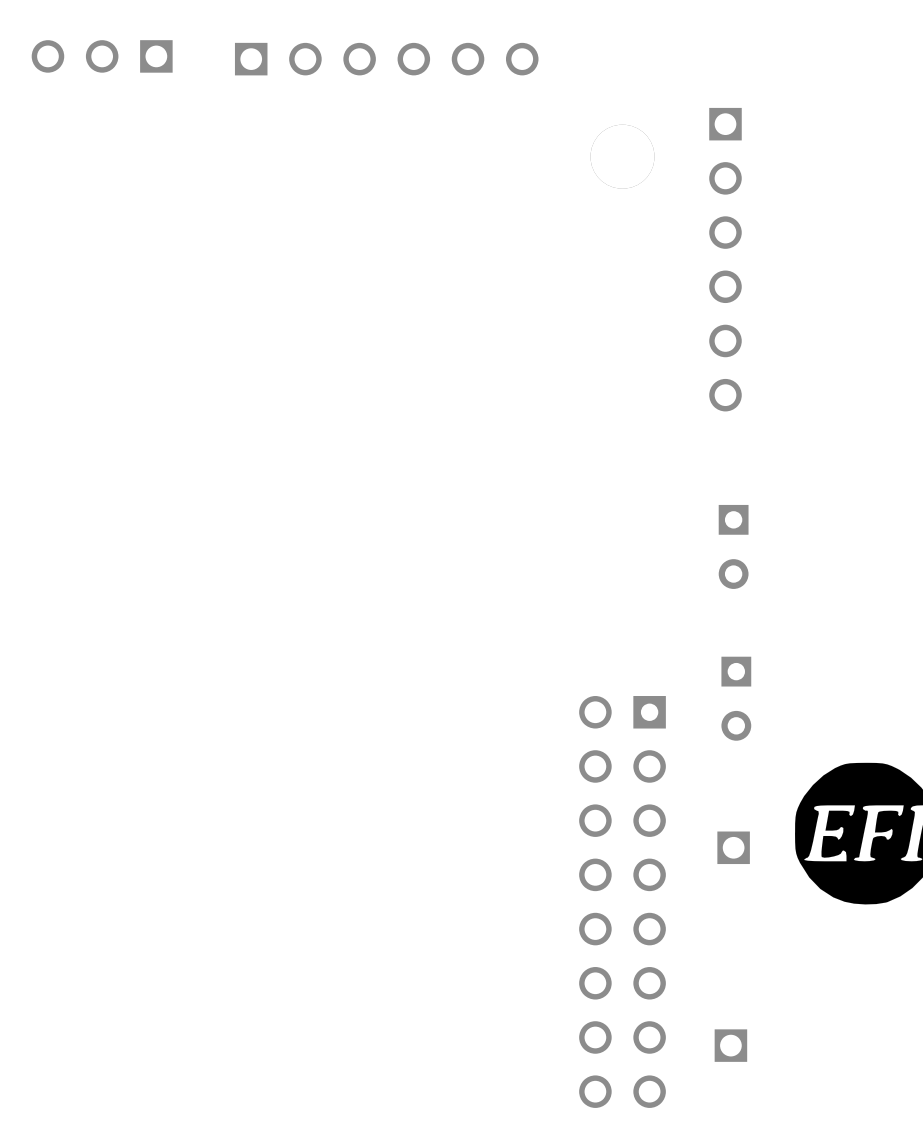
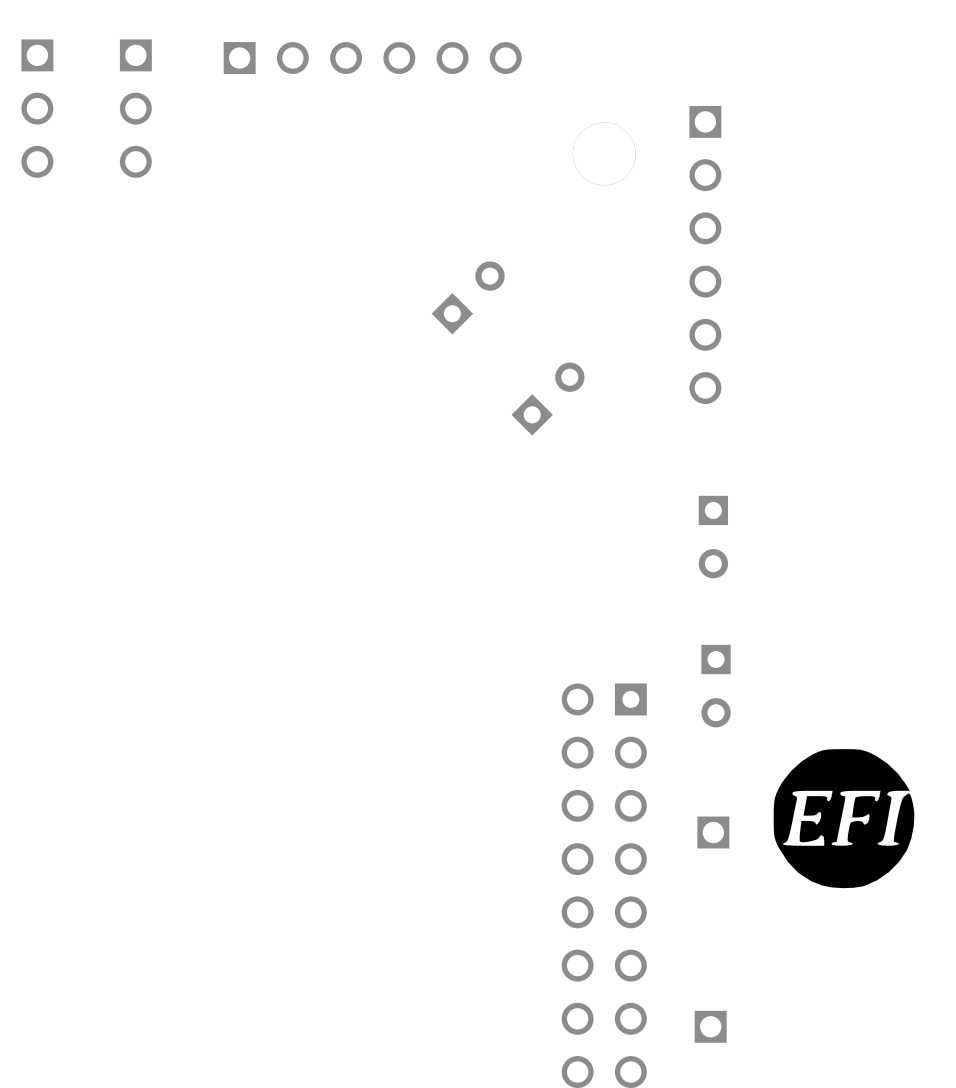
part: (102, 56) -> none
part: none -> (37, 108)
part: none -> (135, 108)
part: none -> (468, 297)
part: none -> (547, 399)

